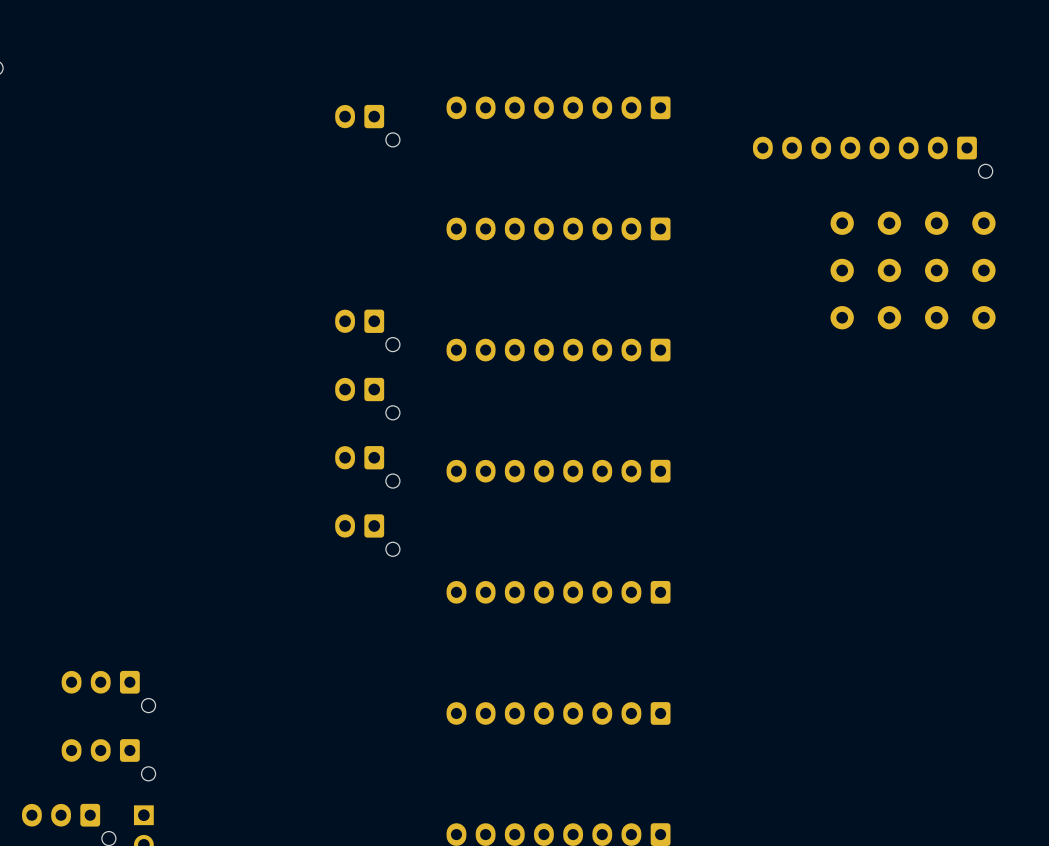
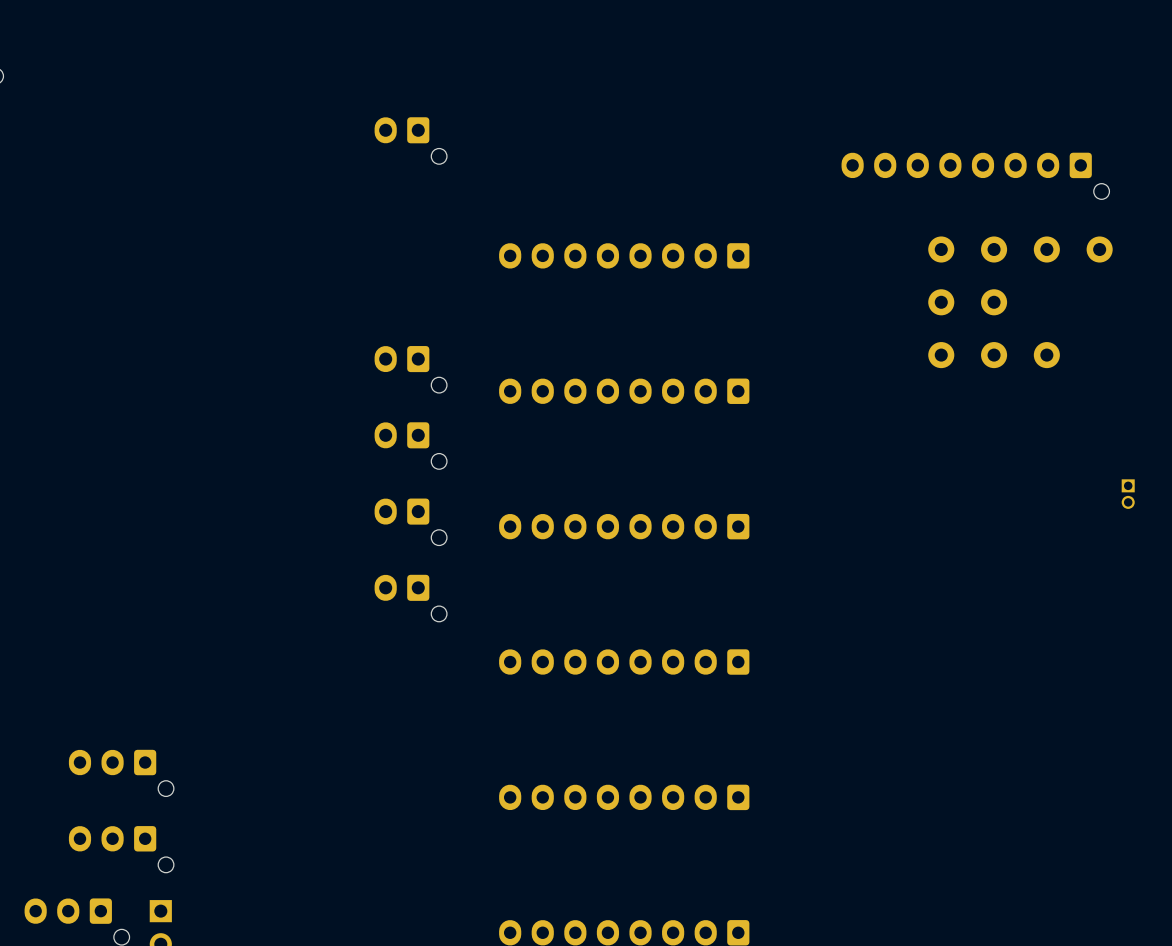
part: (558, 107) -> none
part: (936, 270) -> none
part: (983, 270) -> none
part: (983, 317) -> none
part: none -> (1128, 494)

